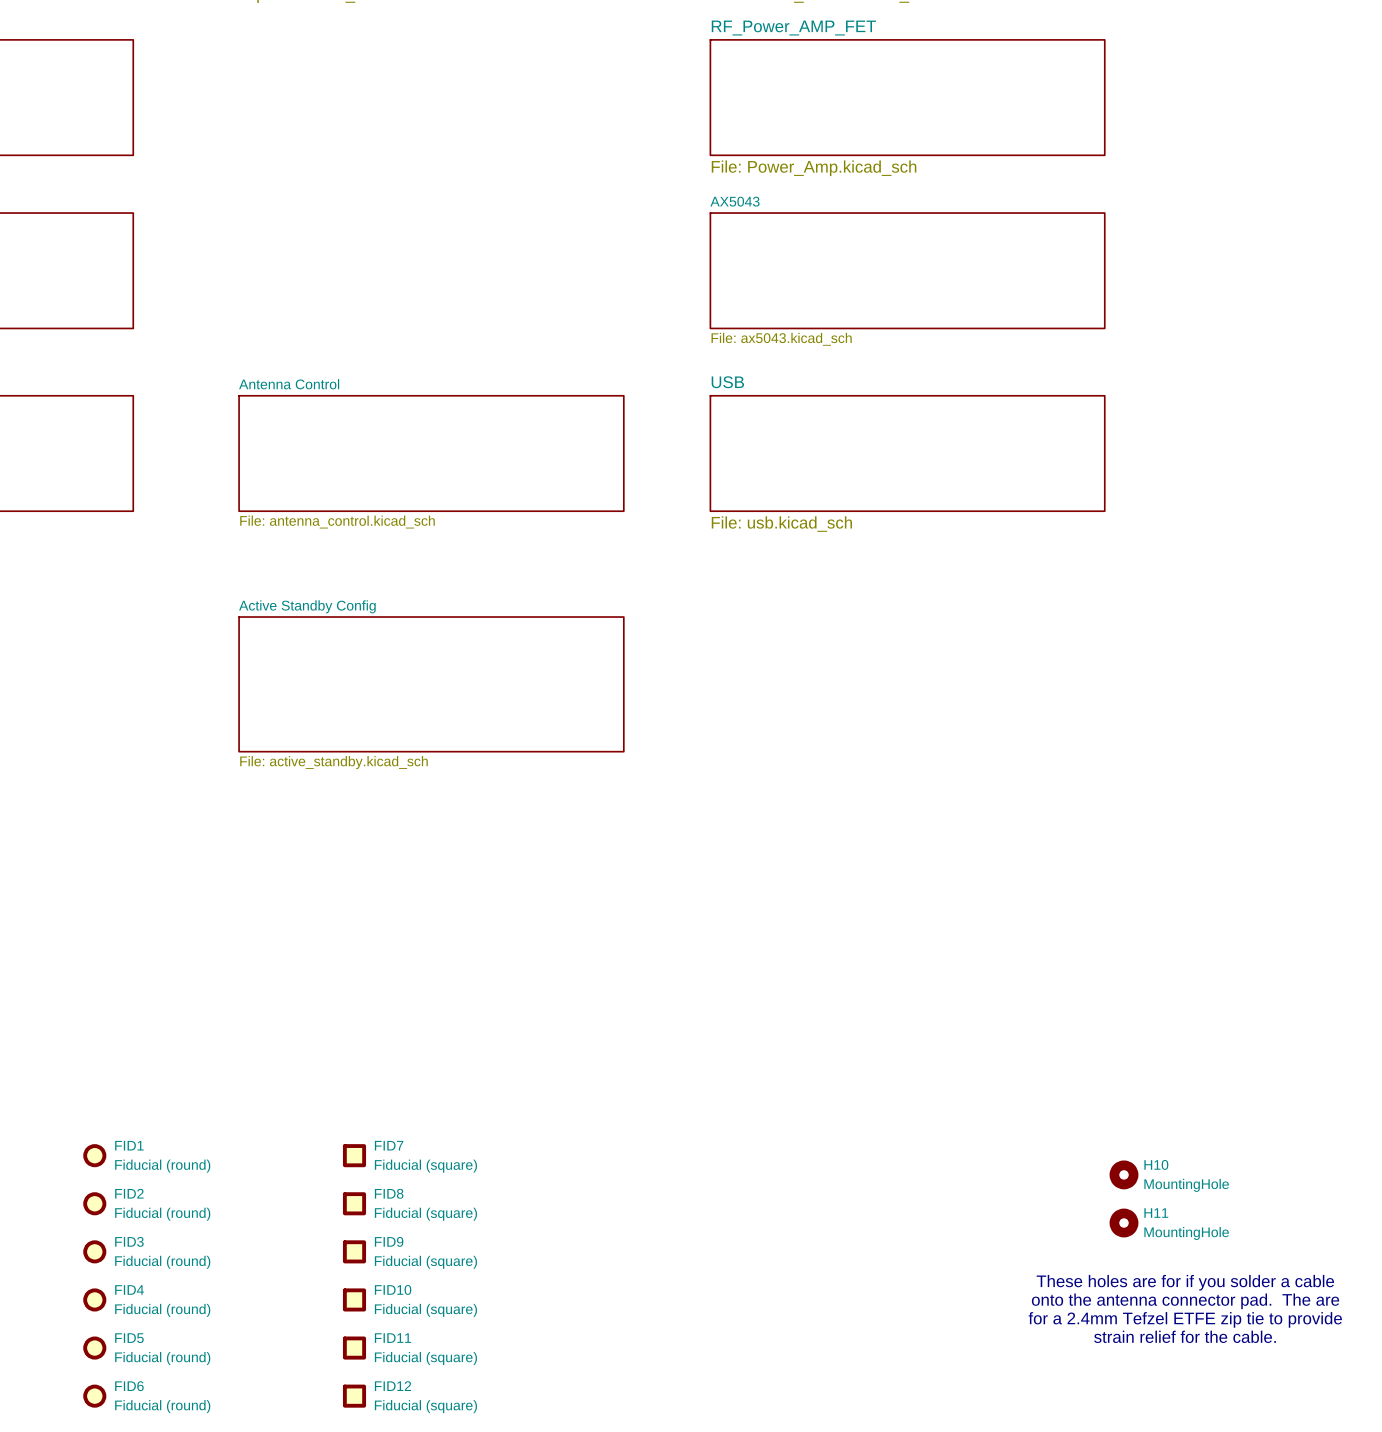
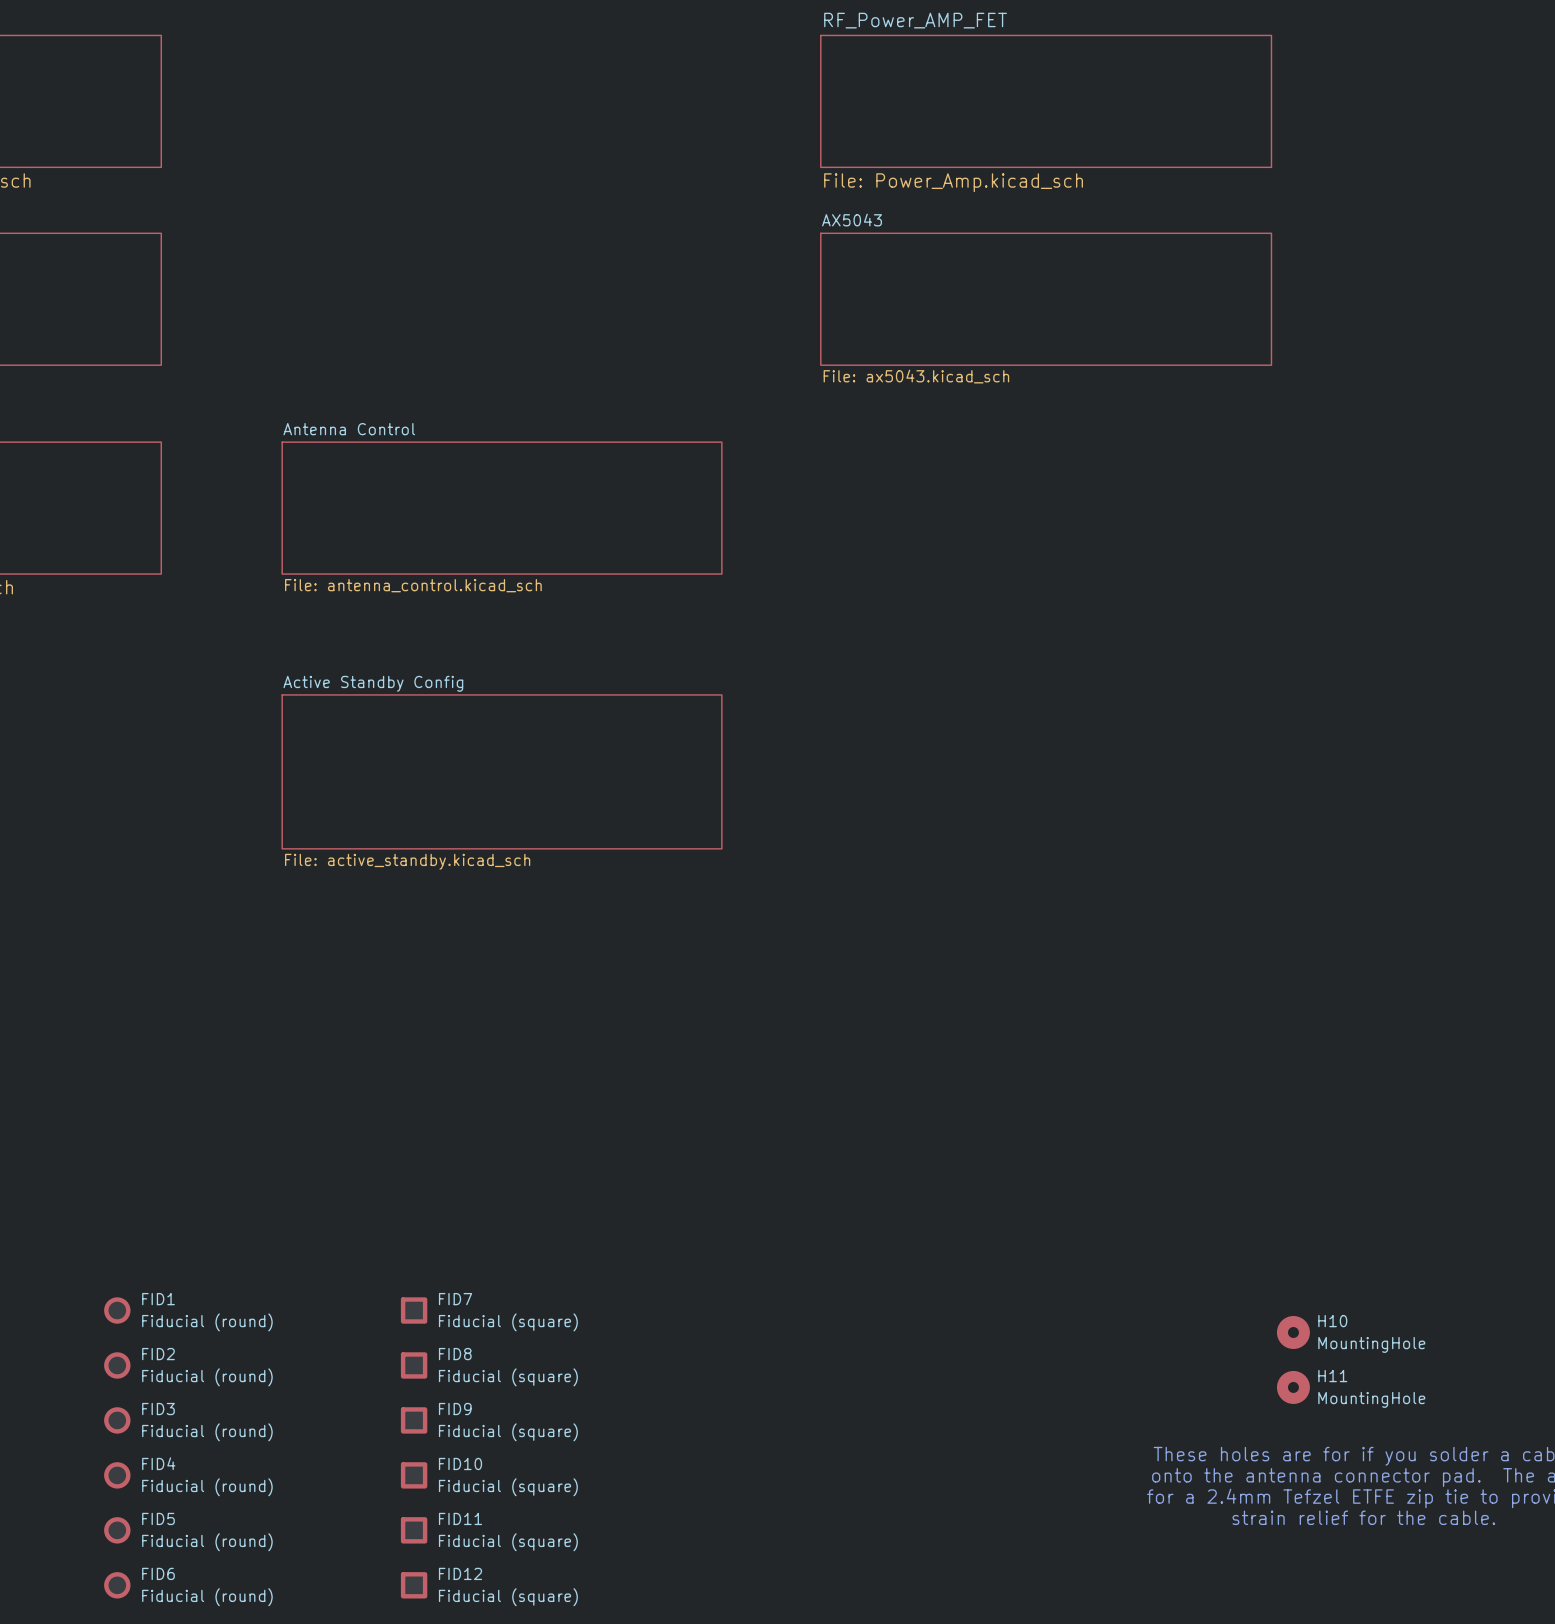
sheet USB: File: usb.kicad_sch (907, 453) -> none

